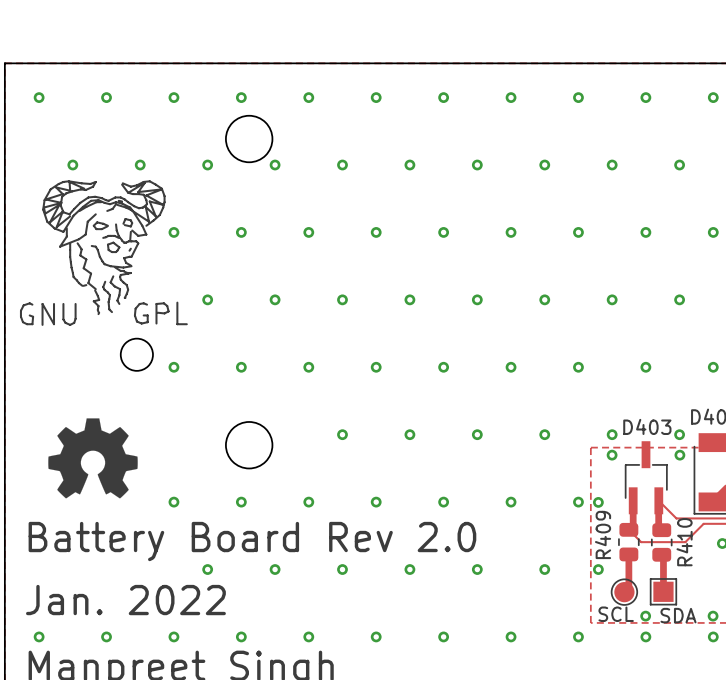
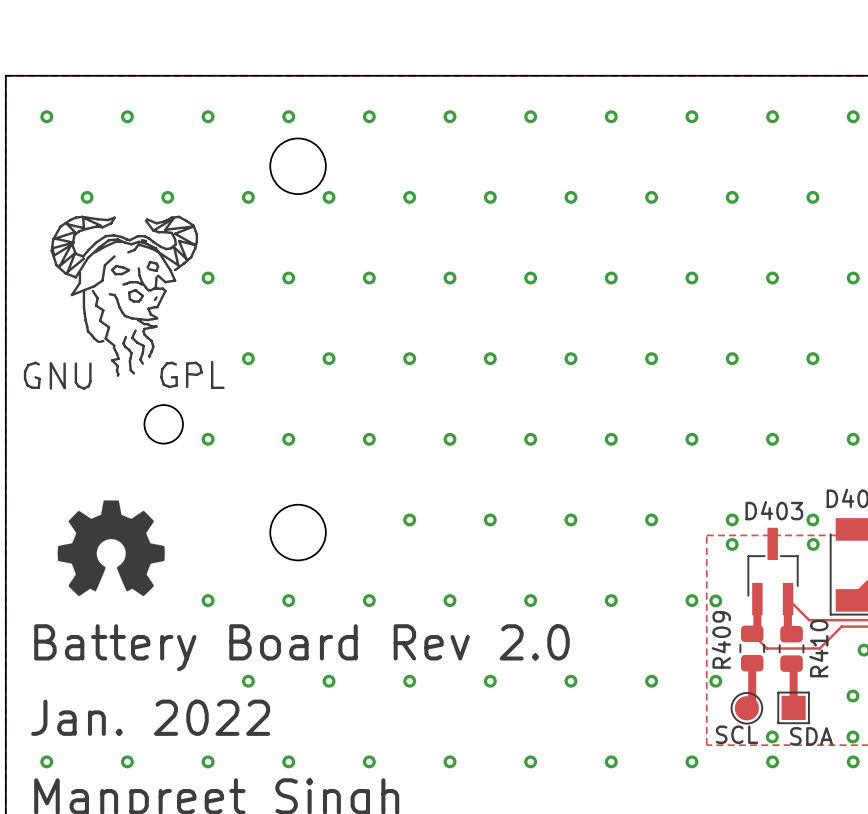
via: none -> (852, 696)

